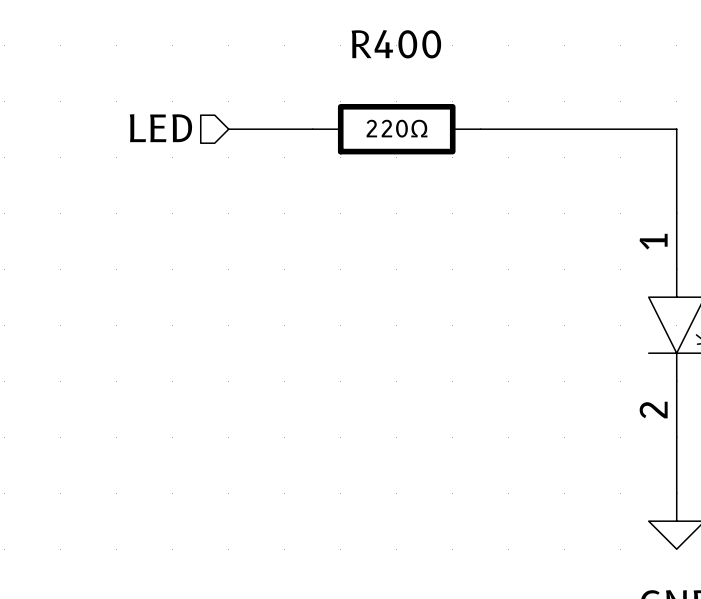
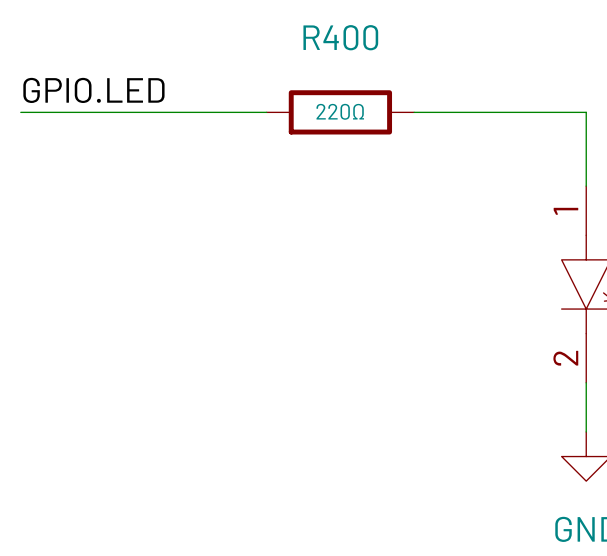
label: none -> GPIO.LED (93, 90)
hierarchical label: LED (160, 128) -> none
wire: none -> (20, 112) (192, 112)

